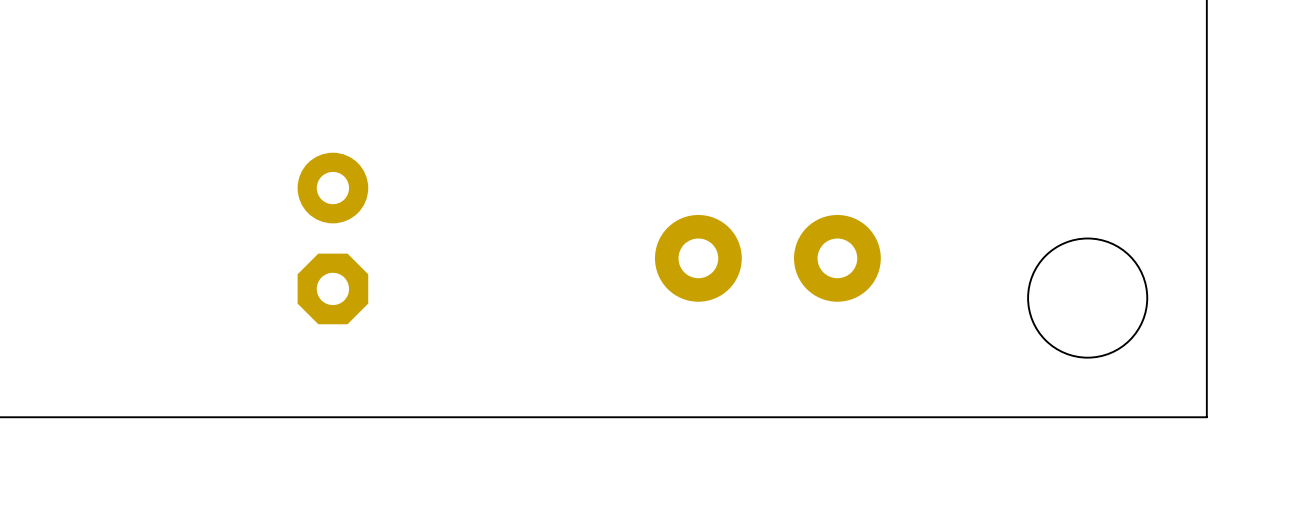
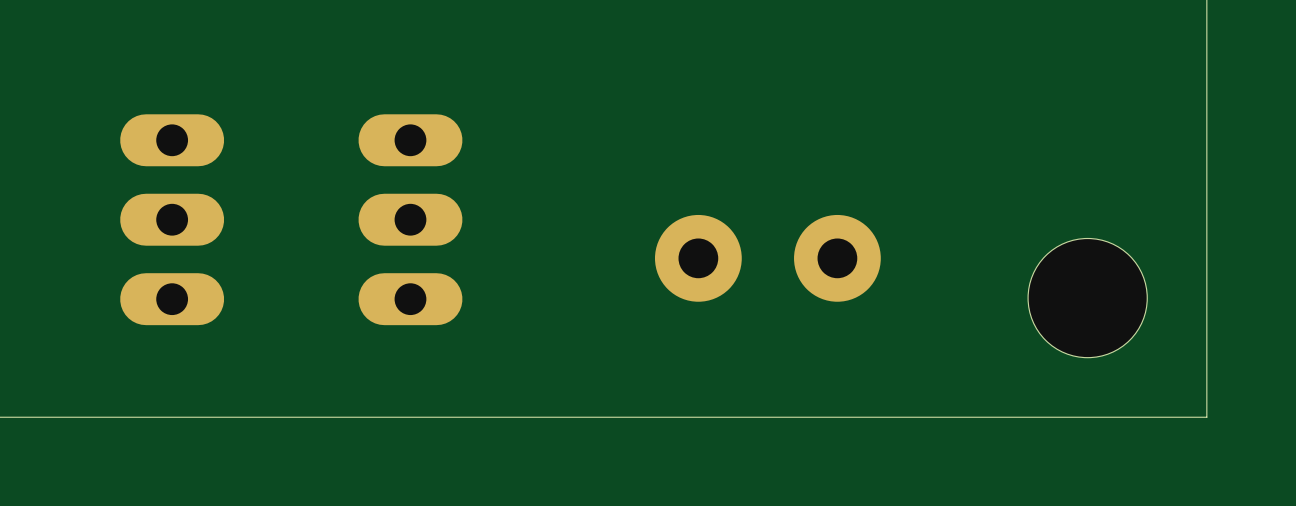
part: none -> (172, 219)
part: none -> (410, 219)
part: (332, 238) -> none

